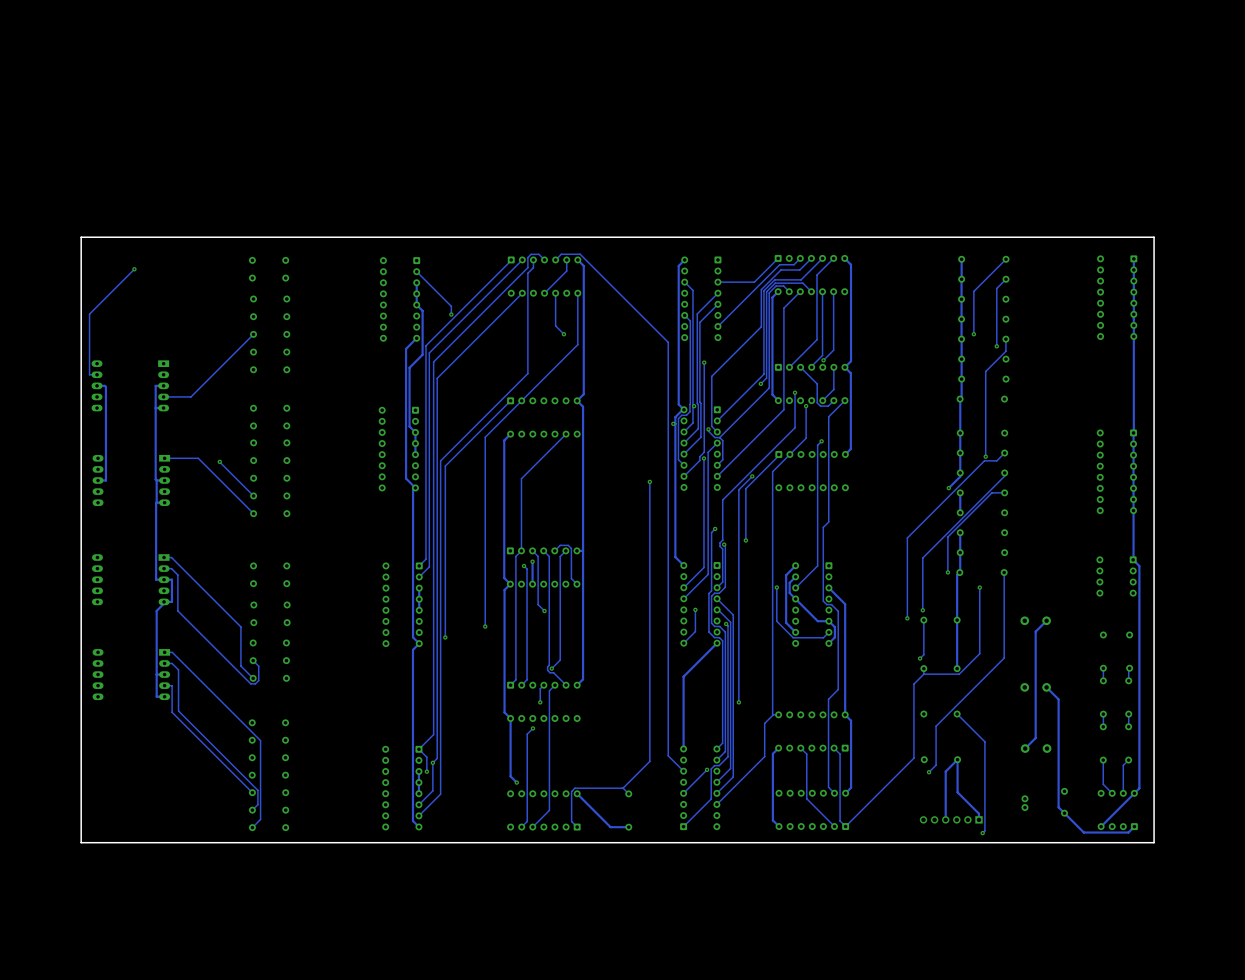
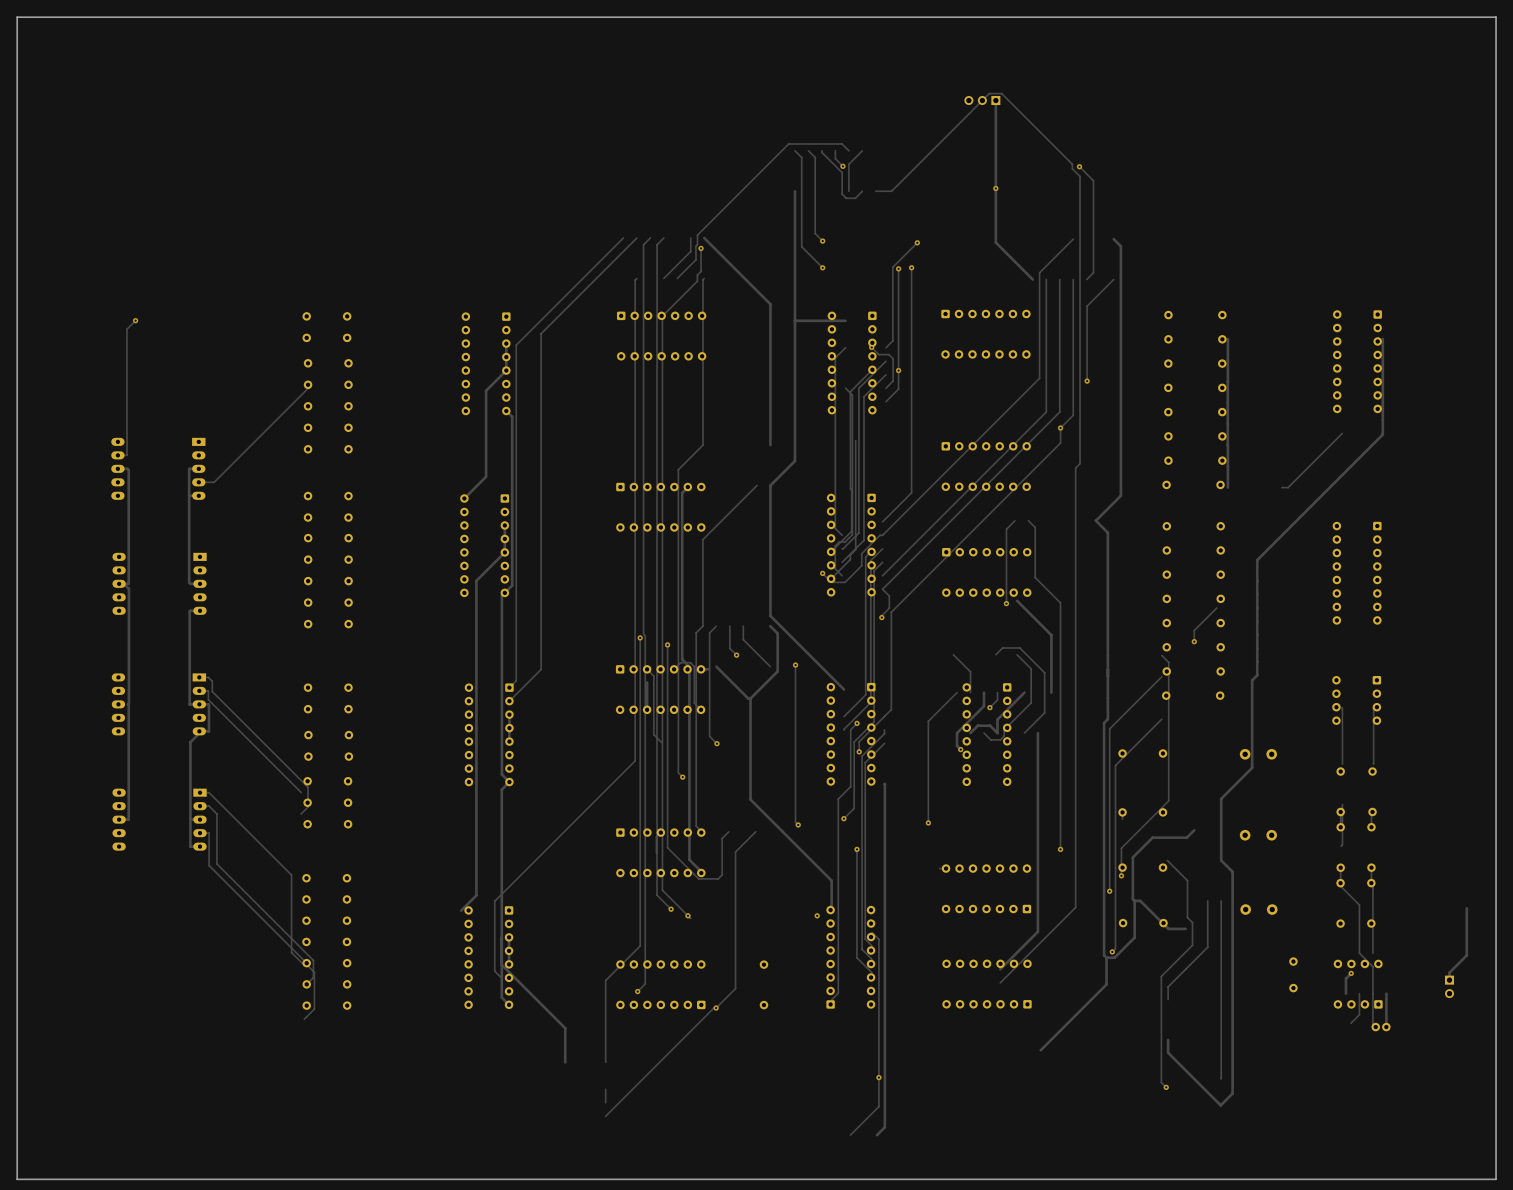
part: none -> (982, 100)
track: none -> (995, 100) (995, 242) (1032, 279)
track: none -> (794, 150) (801, 157) (801, 246) (822, 267)
track: none -> (808, 150) (815, 157) (815, 233) (822, 241)
track: none -> (821, 150) (842, 172) (842, 194) (846, 198) (855, 198) (862, 191)
track: none -> (835, 150) (835, 158) (842, 166)
track: none -> (848, 150) (842, 143) (788, 143) (697, 235) (695, 259) (677, 278)
track: none -> (862, 150) (848, 164) (848, 191)
via: none -> (842, 166)
track: none -> (1079, 166) (1093, 180) (1093, 272) (1086, 279)
via: none -> (1079, 166)
via: none -> (995, 188)
track: none -> (794, 191) (794, 461) (770, 485) (770, 615) (844, 689)
track: none -> (875, 191) (891, 191) (989, 93) (1001, 93) (1072, 164) (1072, 168) (1080, 176) (1080, 463) (1075, 468) (1075, 907) (1000, 982)
track: none -> (650, 238) (643, 244) (645, 983) (637, 991)
track: none -> (663, 238) (657, 244) (657, 895) (671, 909)
track: none -> (704, 238) (770, 304) (770, 445)
track: none -> (1073, 239) (1039, 272) (1039, 378) (882, 535) (880, 535) (861, 553) (861, 565) (845, 582) (831, 582) (822, 573)
track: none -> (1113, 239) (1120, 246) (1120, 495) (1095, 520) (1107, 532) (1107, 719) (1104, 723) (1104, 955) (1106, 957)
via: none -> (822, 241)
track: none -> (917, 242) (892, 267) (892, 340) (885, 347)
via: none -> (917, 242)
track: none -> (701, 248) (701, 271) (697, 275) (697, 281) (662, 316) (662, 890) (690, 918)
via: none -> (701, 248)
via: none -> (822, 267)
track: none -> (911, 267) (911, 492) (882, 521)
via: none -> (911, 267)
track: none -> (898, 268) (898, 389) (885, 401)
via: none -> (898, 268)
track: none -> (636, 278) (635, 280) (635, 760) (494, 901) (494, 971) (501, 978)
track: none -> (704, 278) (703, 445) (678, 469) (678, 772) (682, 777)
track: none -> (1046, 279) (1046, 412) (882, 575)
track: none -> (1059, 279) (1059, 412) (882, 589) (889, 595) (889, 608) (881, 617)
track: none -> (1073, 279) (1073, 415) (1060, 428) (1060, 443) (891, 612) (891, 709) (859, 741) (859, 751)
track: none -> (1113, 279) (1087, 306) (1087, 381)
board edge: (1154, 237) (81, 237) (81, 842) (1154, 842) (1154, 237) -> (1496, 17) (1496, 1179) (17, 1179) (17, 17) (1496, 17)
track: (778, 258) (754, 282) (717, 282) -> none
track: (800, 258) (794, 264) (779, 264) (717, 326) -> none
track: (811, 258) (799, 269) (780, 269) (761, 289) (761, 326) (711, 376) (711, 426) (717, 431) -> none
track: (822, 258) (801, 279) (774, 279) (763, 290) (763, 374) (717, 420) -> none
track: (833, 258) (816, 275) (816, 339) (789, 367) -> none
track: (844, 258) (851, 264) (851, 361) (844, 367) (850, 373) (850, 449) (845, 454) -> none
track: (1133, 258) (1133, 559) (1139, 566) (1139, 788) (1101, 826) -> none
track: (511, 259) (425, 345) (424, 560) -> (623, 238) (516, 345) (516, 680)
track: (522, 259) (429, 352) (429, 566) -> (636, 238) (541, 333) (541, 669) (521, 688)
track: (533, 259) (533, 267) (527, 273) (527, 373) (440, 460) (440, 794) (418, 815) -> none
track: (544, 259) (538, 254) (531, 254) (527, 257) (527, 267) (433, 361) (433, 734) (418, 749) (426, 757) (426, 771) -> none
track: (555, 259) (561, 254) (580, 254) (668, 342) (668, 755) (683, 771) -> none
track: (566, 259) (566, 271) (544, 293) -> (690, 238) (690, 251) (663, 278)
track: (577, 259) (583, 265) (583, 394) (577, 400) (583, 406) (583, 679) (577, 685) -> none
track: (684, 259) (678, 265) (678, 404) (684, 409) -> none
track: (961, 259) (961, 397) (960, 399) -> none
track: (1006, 259) (973, 291) (973, 334) -> none
track: none -> (845, 320) (794, 320)
track: (134, 269) (89, 314) (89, 374) (97, 374) -> (135, 320) (126, 329) (126, 455) (117, 455)
via position: (134, 269) -> (135, 320)
track: (416, 271) (451, 306) (451, 314) -> none
track: (1006, 279) (996, 288) (996, 346) -> none
track: none -> (1227, 339) (1227, 487)
track: none -> (1382, 339) (1382, 434) (1257, 560) (1257, 675) (1252, 680) (1252, 767) (1221, 798) (1221, 860) (1232, 871) (1232, 1093) (1220, 1105) (1168, 1052) (1168, 1039)
track: (684, 282) (692, 290) (692, 423) (684, 431) -> none
track: none -> (871, 347) (878, 354) (888, 354) (893, 358) (893, 381) (885, 388)
via: none -> (871, 347)
track: none -> (845, 347) (835, 357) (835, 528) (842, 535)
track: (778, 291) (772, 297) (772, 394) (778, 400) -> none
track: (789, 291) (783, 286) (776, 286) (769, 292) (769, 388) (719, 437) -> none
track: (800, 291) (783, 308) (783, 409) (717, 476) -> none
track: (811, 291) (802, 283) (775, 283) (766, 291) (766, 378) (760, 383) -> none
track: (822, 291) (822, 355) (811, 367) -> none
track: (833, 291) (833, 350) (823, 360) -> none
track: (522, 293) (437, 378) (437, 758) (432, 762) (432, 790) (418, 804) -> none
track: (555, 293) (555, 325) (563, 334) -> none
track: (577, 293) (577, 344) (485, 437) (485, 626) -> none
track: (717, 293) (697, 313) (698, 428) (684, 443) -> none
track: none -> (885, 361) (858, 388) (858, 532) (842, 548)
track: (416, 304) (422, 310) (422, 354) (409, 367) (409, 426) (415, 432) -> (506, 370) (486, 390) (486, 476) (464, 498)
via: none -> (898, 370)
track: none -> (885, 374) (863, 396) (863, 540) (842, 562)
via: none -> (1087, 381)
via: (451, 314) -> none
track: (684, 315) (690, 321) (690, 404) (689, 411) (678, 418) (678, 459) (684, 465) -> none
track: none -> (845, 388) (852, 395) (852, 534) (845, 542) (839, 542) (835, 545) (835, 568) (842, 575)
track: (253, 334) (190, 396) (176, 396) -> (309, 386) (214, 482)
via: (563, 334) -> none
via: (973, 334) -> none
track: (416, 338) (406, 348) (406, 478) (415, 487) -> (506, 411) (512, 416) (512, 585) (504, 592)
track: (1005, 339) (1005, 351) (985, 371) (985, 456) -> none
via: (996, 346) -> none
via: none -> (1060, 428)
track: none -> (1342, 433) (1288, 487) (1281, 487)
via: (823, 360) -> none
via: (704, 362) -> none
track: (800, 367) (817, 383) (817, 402) (820, 406) (828, 406) (833, 400) -> none
track: (833, 367) (833, 389) (822, 400) -> none
via: (760, 383) -> none
track: (795, 392) (795, 427) (722, 500) (722, 540) (720, 542) (722, 549) (722, 582) (717, 587) -> none
via: (795, 392) -> none
track: (960, 398) (960, 476) (948, 488) -> none
track: none -> (689, 485) (682, 492) (682, 659) (689, 666) (689, 859) (701, 872)
track: none -> (756, 485) (702, 539) (702, 626) (696, 632) (696, 826) (701, 831)
track: (510, 400) (445, 466) (445, 637) -> none
track: (844, 400) (828, 416) (828, 521) (823, 527) (823, 601) (826, 604) (831, 604) (838, 611) (838, 689) (828, 699) (828, 787) (834, 793) -> none
via: (694, 406) -> none
track: (806, 406) (806, 438) (772, 471) (773, 714) (764, 723) (764, 756) (716, 804) -> none
via: (806, 406) -> none
track: (683, 409) (675, 417) (675, 557) (683, 565) -> none
via: (673, 423) -> none
track: none -> (1015, 520) (1006, 529) (1006, 603)
track: none -> (1028, 520) (1035, 527) (1035, 577) (1060, 602) (1060, 849)
track: (708, 429) (714, 437) (719, 437) -> none
via: (708, 429) -> none
track: (510, 434) (504, 440) (504, 578) (510, 584) (504, 590) (504, 712) (510, 718) (510, 776) (516, 782) -> none
track: (566, 434) (521, 478) (521, 550) (515, 556) (515, 679) (510, 685) -> none
track: (719, 437) (722, 440) (722, 459) (717, 465) -> none
track: (821, 441) (817, 445) (817, 565) (795, 587) -> none
via: (821, 441) -> none
track: (717, 443) (708, 452) (708, 574) (683, 598) -> none
track: none -> (882, 548) (870, 560) (870, 702) (844, 729)
track: (1004, 453) (996, 460) (984, 460) (907, 537) (907, 618) -> none
track: none -> (504, 552) (476, 580) (476, 895) (461, 910)
track: none -> (870, 551) (865, 556) (865, 694) (844, 716)
track: (778, 454) (745, 488) (745, 540) -> none
via: (985, 456) -> none
track: (164, 458) (198, 458) (253, 513) -> none
track: (703, 458) (703, 567) (683, 587) -> none
via: (703, 458) -> none
track: (219, 461) (253, 495) -> none
via: (219, 461) -> none
track: none -> (882, 562) (874, 570) (874, 722) (854, 741) (854, 808) (843, 818)
via: none -> (822, 573)
track: (1004, 472) (1004, 476) (922, 558) (922, 610) -> none
track: (752, 476) (738, 489) (738, 702) -> none
via: (752, 476) -> none
track: none -> (123, 583) (128, 588) (128, 819) (119, 819)
track: (156, 480) (156, 502) -> none
track: (649, 481) (649, 761) (623, 788) -> none
via: (649, 481) -> none
via: (948, 488) -> none
track: (960, 492) (960, 512) -> none
track: (1004, 492) (992, 492) (947, 536) (947, 572) -> none
track: none -> (1017, 600) (1051, 635) (1051, 692)
via: none -> (1006, 603)
track: none -> (1216, 607) (1194, 630) (1194, 641)
via: none -> (881, 617)
track: none -> (716, 626) (709, 632) (709, 736) (716, 743)
track: none -> (729, 626) (729, 648) (736, 655)
track: none -> (743, 626) (743, 639) (770, 666)
track: none -> (770, 626) (777, 633) (777, 671) (750, 698)
track: none -> (640, 637) (640, 946) (605, 980) (605, 1062)
via: none -> (640, 637)
track: (715, 528) (711, 532) (711, 590) (708, 593) (708, 632) (714, 637) (719, 637) (722, 640) (722, 743) (716, 748) -> none
via: (715, 528) -> none
via: none -> (1194, 641)
via: none -> (667, 644)
track: (960, 532) (960, 572) (957, 575) (957, 668) -> none
track: none -> (953, 654) (970, 671) (970, 692)
track: none -> (995, 654) (1002, 647) (1019, 647) (1044, 672) (1044, 712) (1024, 733)
track: none -> (1017, 654) (1031, 668) (1031, 702) (1004, 729) (1004, 736) (1000, 739) (990, 739) (983, 733)
via: none -> (736, 655)
track: none -> (1161, 655) (1168, 662) (1168, 800) (1121, 848) (1121, 875)
via: (745, 540) -> none
track: (724, 544) (725, 587) (719, 593) (714, 593) (711, 596) (711, 623) (714, 626) (719, 626) (725, 632) (725, 751) (716, 760) -> none
via: (724, 544) -> none
track: none -> (795, 665) (795, 822) (798, 824)
via: none -> (795, 665)
track: none -> (716, 666) (750, 698)
track: (543, 550) (549, 556) (549, 665) (547, 670) (553, 672) (566, 685) -> none
track: (565, 550) (560, 556) (560, 660) (551, 668) -> none
track: none -> (1161, 676) (1109, 728) (1109, 891)
track: (174, 560) (240, 626) (240, 666) (253, 678) -> (212, 681) (212, 691) (307, 787) (307, 807) (301, 813)
via: (532, 561) -> none
track: (795, 565) (786, 575) (786, 622) (795, 632) -> none
track: (524, 566) (527, 569) (527, 679) (521, 685) -> none
via: (524, 566) -> none
track: (171, 568) (177, 574) (177, 610) (250, 683) (255, 683) (258, 680) (258, 666) (253, 660) -> (208, 690) (208, 699) (301, 792)
track: none -> (957, 692) (928, 721) (928, 822)
track: none -> (983, 692) (983, 706) (957, 733) (957, 745) (960, 749)
track: none -> (997, 692) (997, 700) (989, 707)
track: none -> (1024, 692) (997, 719) (997, 733) (990, 725) (977, 725) (970, 733)
via: (947, 572) -> none
track: (1004, 572) (1004, 658) (936, 726) (936, 765) (929, 772) -> none
track: none -> (750, 698) (750, 799) (831, 880) (831, 905)
track: (795, 576) (789, 582) (789, 593) (817, 621) (828, 621) (834, 627) (834, 637) (828, 643) -> none
via: none -> (989, 707)
track: none -> (1341, 707) (1342, 764)
track: none -> (1373, 707) (1373, 763)
track: (776, 587) (776, 621) (793, 637) (823, 637) (828, 632) -> none
via: (776, 587) -> none
track: (828, 587) (845, 604) (845, 714) (851, 720) (851, 787) (845, 793) -> none
track: (979, 587) (979, 653) (959, 674) (923, 674) (913, 684) (913, 758) (845, 826) (840, 820) (840, 754) (834, 748) -> none
via: (979, 587) -> none
track: none -> (1161, 719) (1115, 765) (1115, 948) (1112, 951)
track: none -> (857, 723) (850, 729) (850, 786) (838, 799) (838, 993) (831, 999)
via: none -> (857, 723)
track: (717, 598) (733, 614) (733, 777) (716, 793) -> none
track: none -> (884, 729) (884, 733) (862, 756) (862, 949) (872, 959)
track: none -> (1037, 733) (1037, 931) (1000, 969)
track: (695, 609) (695, 631) (683, 643) -> none
via: (695, 609) -> none
track: (717, 609) (730, 622) (730, 768) (716, 782) -> none
via: (922, 610) -> none
via: (544, 611) -> none
track: none -> (884, 743) (865, 762) (865, 939) (872, 945)
via: none -> (716, 743)
via: none -> (960, 749)
via: none -> (859, 751)
via: (907, 618) -> none
track: (923, 620) (923, 654) (920, 658) -> none
track: (1046, 620) (1035, 631) (1035, 738) (1025, 748) -> none
track: (726, 624) (727, 625) (727, 756) (719, 765) (714, 765) (711, 768) (711, 799) (683, 826) -> none
via: (726, 624) -> none
via: (485, 626) -> none
via: (445, 637) -> none
via: none -> (682, 777)
track: (717, 643) (683, 676) (683, 748) -> none
track: none -> (884, 783) (884, 1127) (877, 1135)
track: (172, 652) (260, 740) (260, 819) (252, 827) -> (209, 792) (291, 875) (291, 952) (314, 972) (314, 1009) (304, 1019)
via: (920, 658) -> none
track: none -> (1342, 804) (1341, 846)
via: (551, 668) -> none
via: none -> (843, 818)
via: none -> (928, 822)
via: none -> (798, 824)
track: none -> (1194, 830) (1186, 837) (1152, 837) (1132, 857) (1132, 899) (1134, 900)
track: none -> (755, 831) (735, 852) (735, 988) (605, 1116)
track: (554, 685) (549, 690) -> (667, 644) (667, 839)
track: (1046, 687) (1058, 699) (1058, 807) (1083, 832) (1128, 832) (1134, 826) -> none
track: (549, 697) (549, 810) (532, 827) -> (667, 847) (698, 878) (718, 878) (722, 874) (722, 838) (728, 831)
track: none -> (856, 849) (856, 957) (872, 972)
via: none -> (856, 849)
via: none -> (1060, 849)
via: (540, 702) -> none
via: (738, 702) -> none
track: none -> (1167, 860) (1187, 880) (1187, 917) (1192, 922) (1192, 945) (1161, 976) (1161, 1082) (1166, 1087)
track: (957, 714) (984, 741) (984, 830) (982, 833) -> none
via: none -> (1121, 875)
track: (532, 728) (527, 734) (527, 821) (521, 827) -> none
via: (532, 728) -> none
track: none -> (1341, 886) (1359, 905) (1359, 953) (1372, 966) (1372, 1024) (1375, 1027)
track: none -> (1371, 886) (1372, 953)
via: none -> (1109, 891)
track: none -> (1134, 900) (1134, 937) (1114, 957) (1106, 957)
track: none -> (1134, 900) (1140, 900) (1168, 928) (1185, 928)
track: none -> (1207, 900) (1207, 947) (1168, 986) (1168, 999)
track: none -> (1221, 900) (1220, 1078)
track: none -> (1466, 908) (1466, 955) (1449, 972) (1449, 980)
via: none -> (671, 909)
track: (778, 748) (772, 753) (772, 820) (779, 826) -> none
track: (800, 748) (806, 754) (806, 798) (834, 826) -> none
via: none -> (687, 915)
via: none -> (817, 915)
track: (1103, 760) (1103, 784) (1112, 793) -> none
track: (1128, 760) (1123, 765) (1123, 793) -> none
via: (432, 762) -> none
track: none -> (872, 932) (878, 939) (878, 1106) (850, 1135)
track: (706, 769) (683, 793) -> none
via: (707, 769) -> none
track: none -> (501, 937) (501, 964) (565, 1028) (565, 1062)
via: (426, 771) -> none
via position: (929, 772) -> (1112, 951)
via: (516, 782) -> none
track: (623, 788) (574, 788) (571, 791) (571, 821) (577, 827) -> none
track: (623, 788) (628, 793) -> none
track: none -> (1106, 957) (1106, 984) (1040, 1050)
track: (577, 793) (610, 827) (628, 827) -> none
track: none -> (1351, 973) (1345, 978) (1345, 993)
via: none -> (1351, 973)
part: (1024, 803) -> none
part: none -> (1449, 986)
via: none -> (637, 991)
track: none -> (1359, 993) (1359, 1014) (1350, 1023)
track: none -> (1386, 993) (1386, 1027)
part: (951, 819) -> none
track: (978, 819) (978, 813) (957, 792) (957, 759) (945, 771) (945, 819) -> none
via: none -> (716, 1008)
via: (982, 833) -> none
part: none -> (1381, 1027)
via: none -> (878, 1077)
via: none -> (1166, 1087)
track: none -> (605, 1089) (605, 1102)

